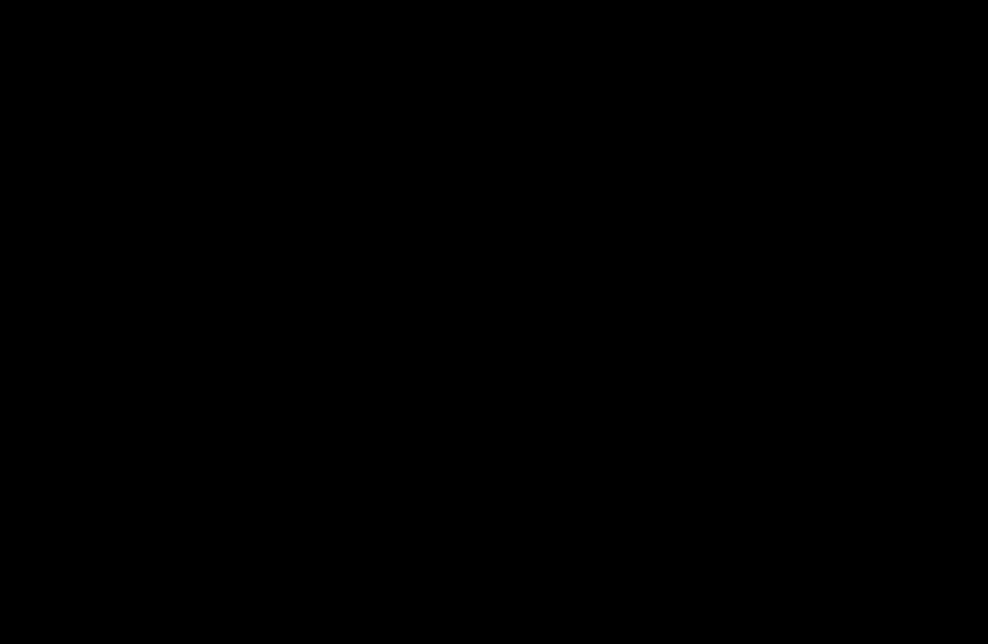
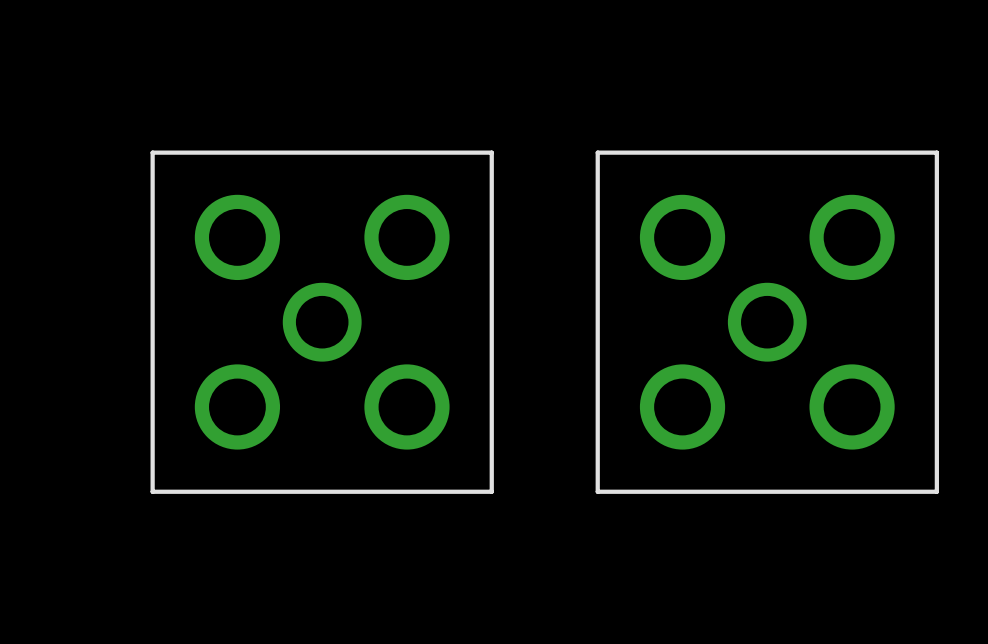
part: none -> (322, 322)
part: none -> (767, 322)

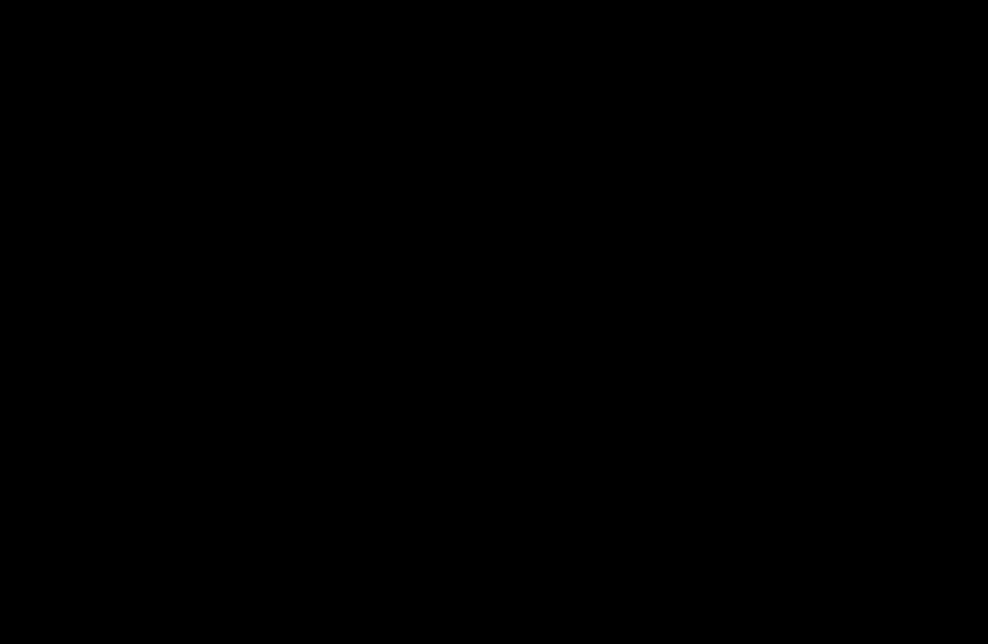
part: (322, 322) -> none
part: (767, 322) -> none

